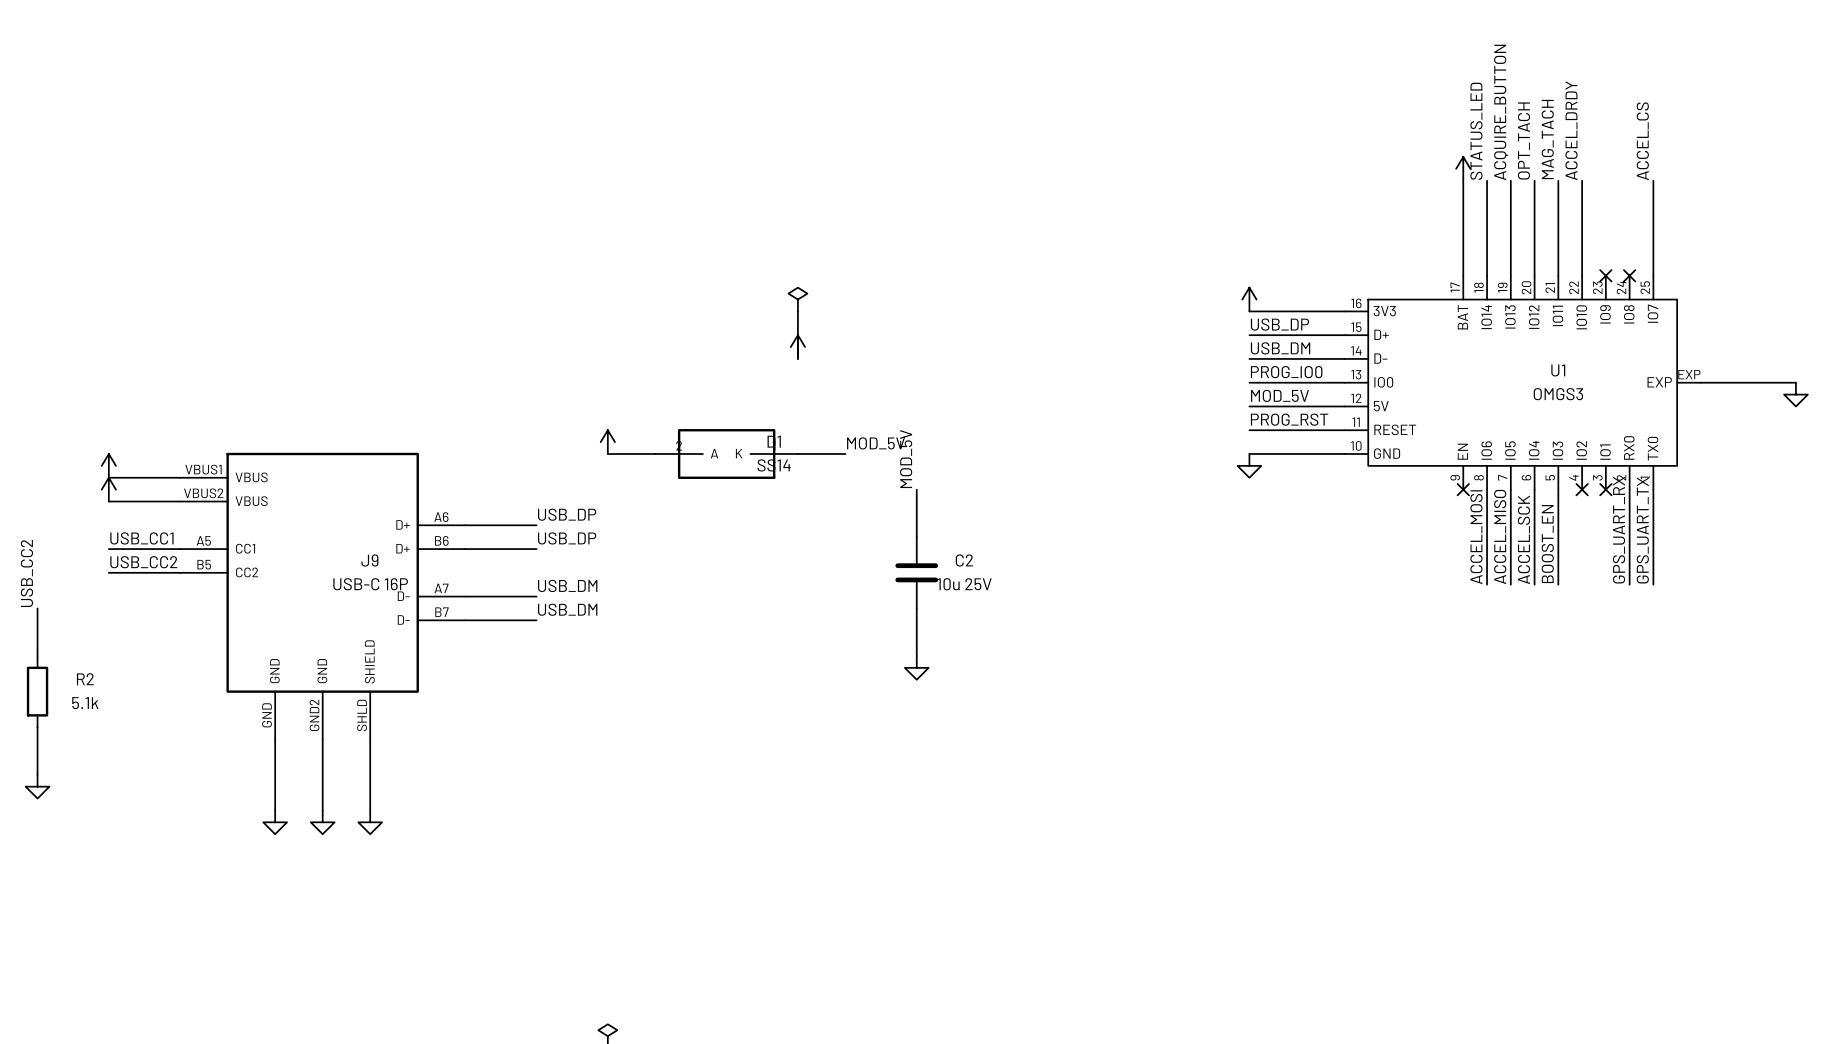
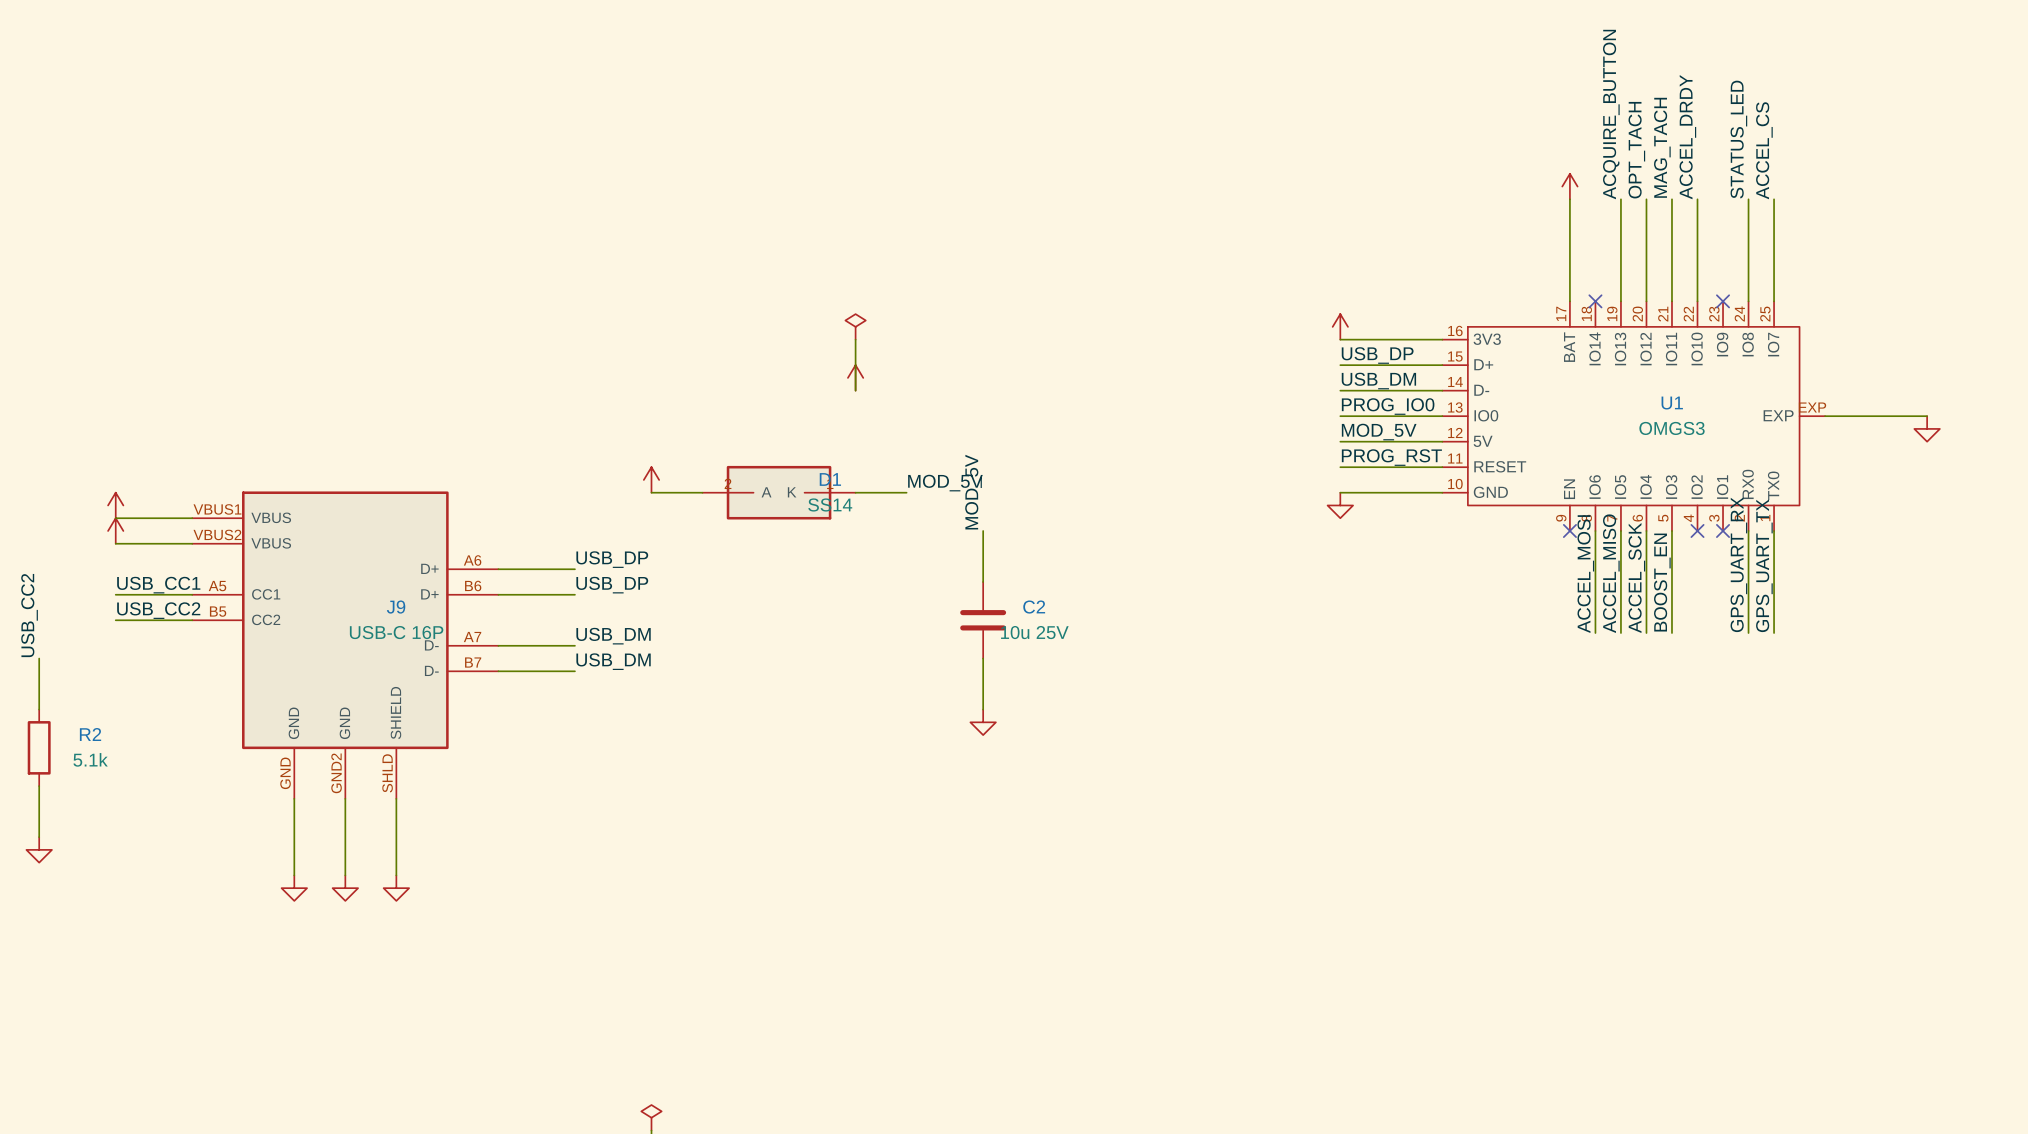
label position: STATUS_LED (1476, 131) -> STATUS_LED (1738, 139)
wire: (1487, 180) (1487, 275) -> (1748, 199) (1748, 301)
no-connect mark: none -> (1595, 301)
no-connect mark: (1629, 275) -> none

